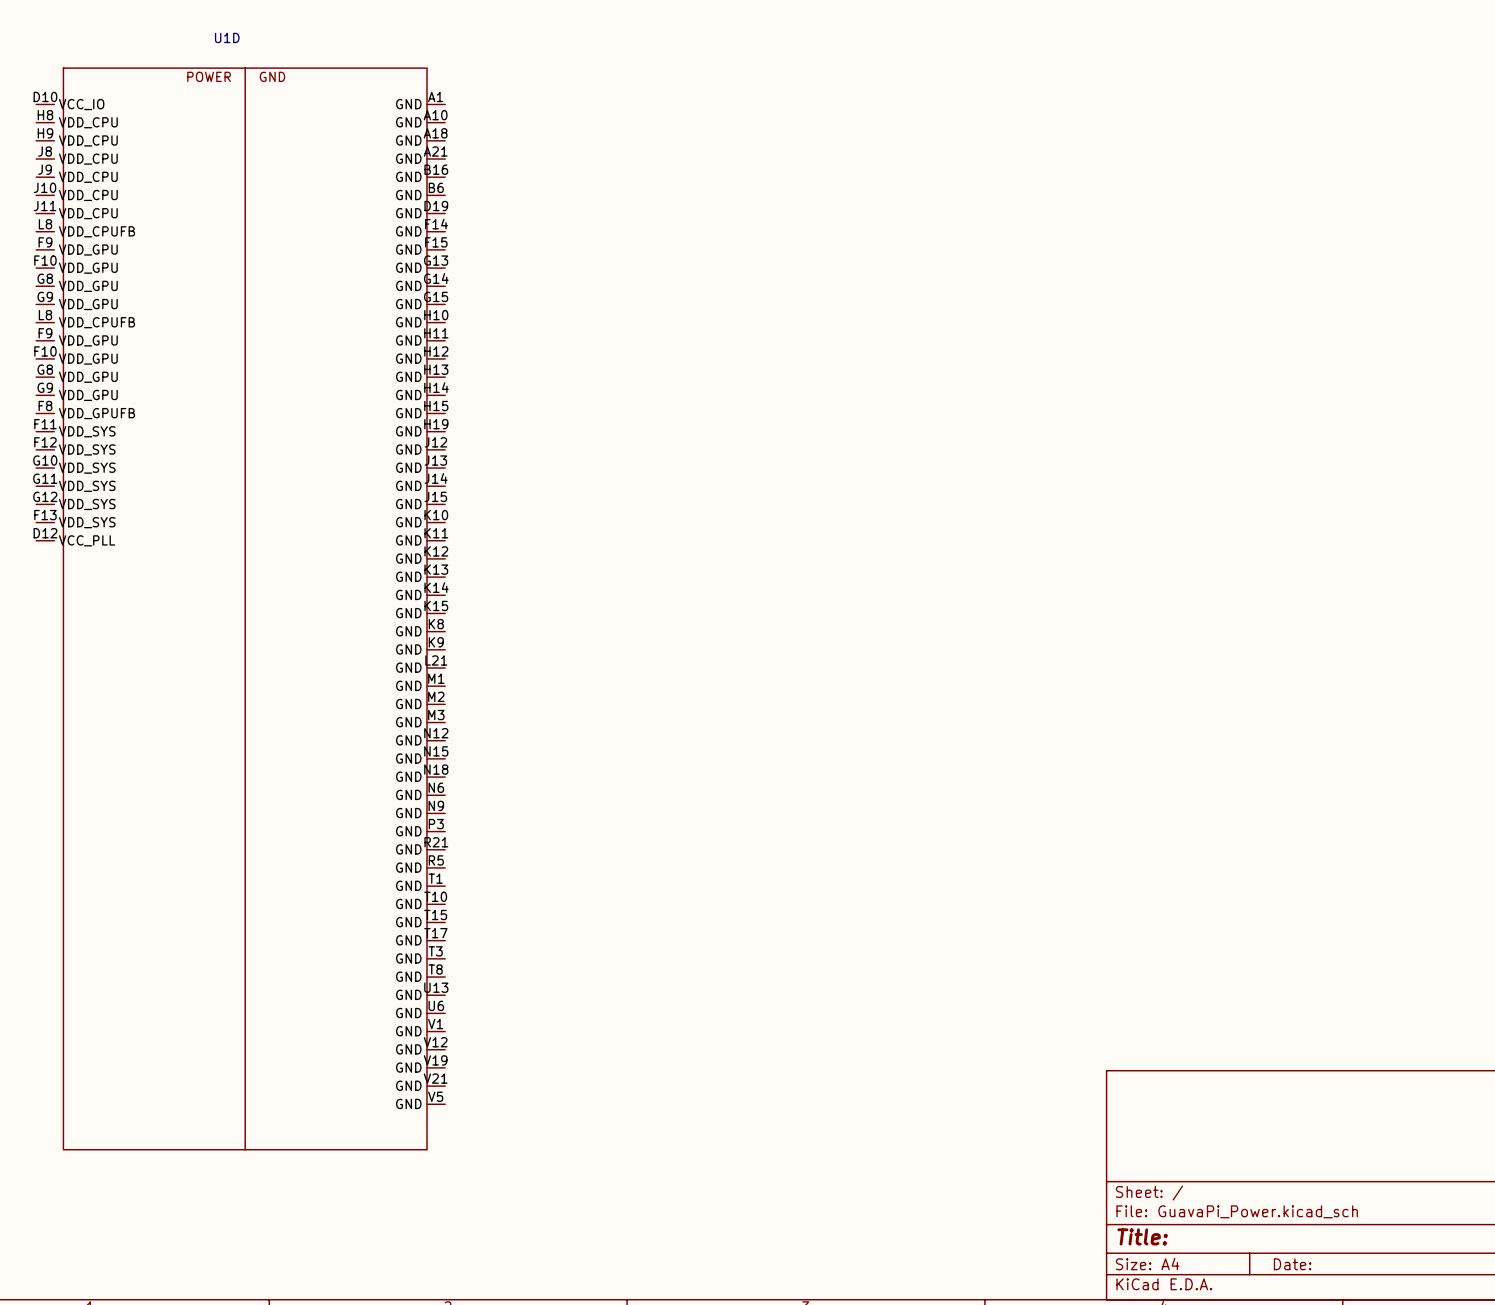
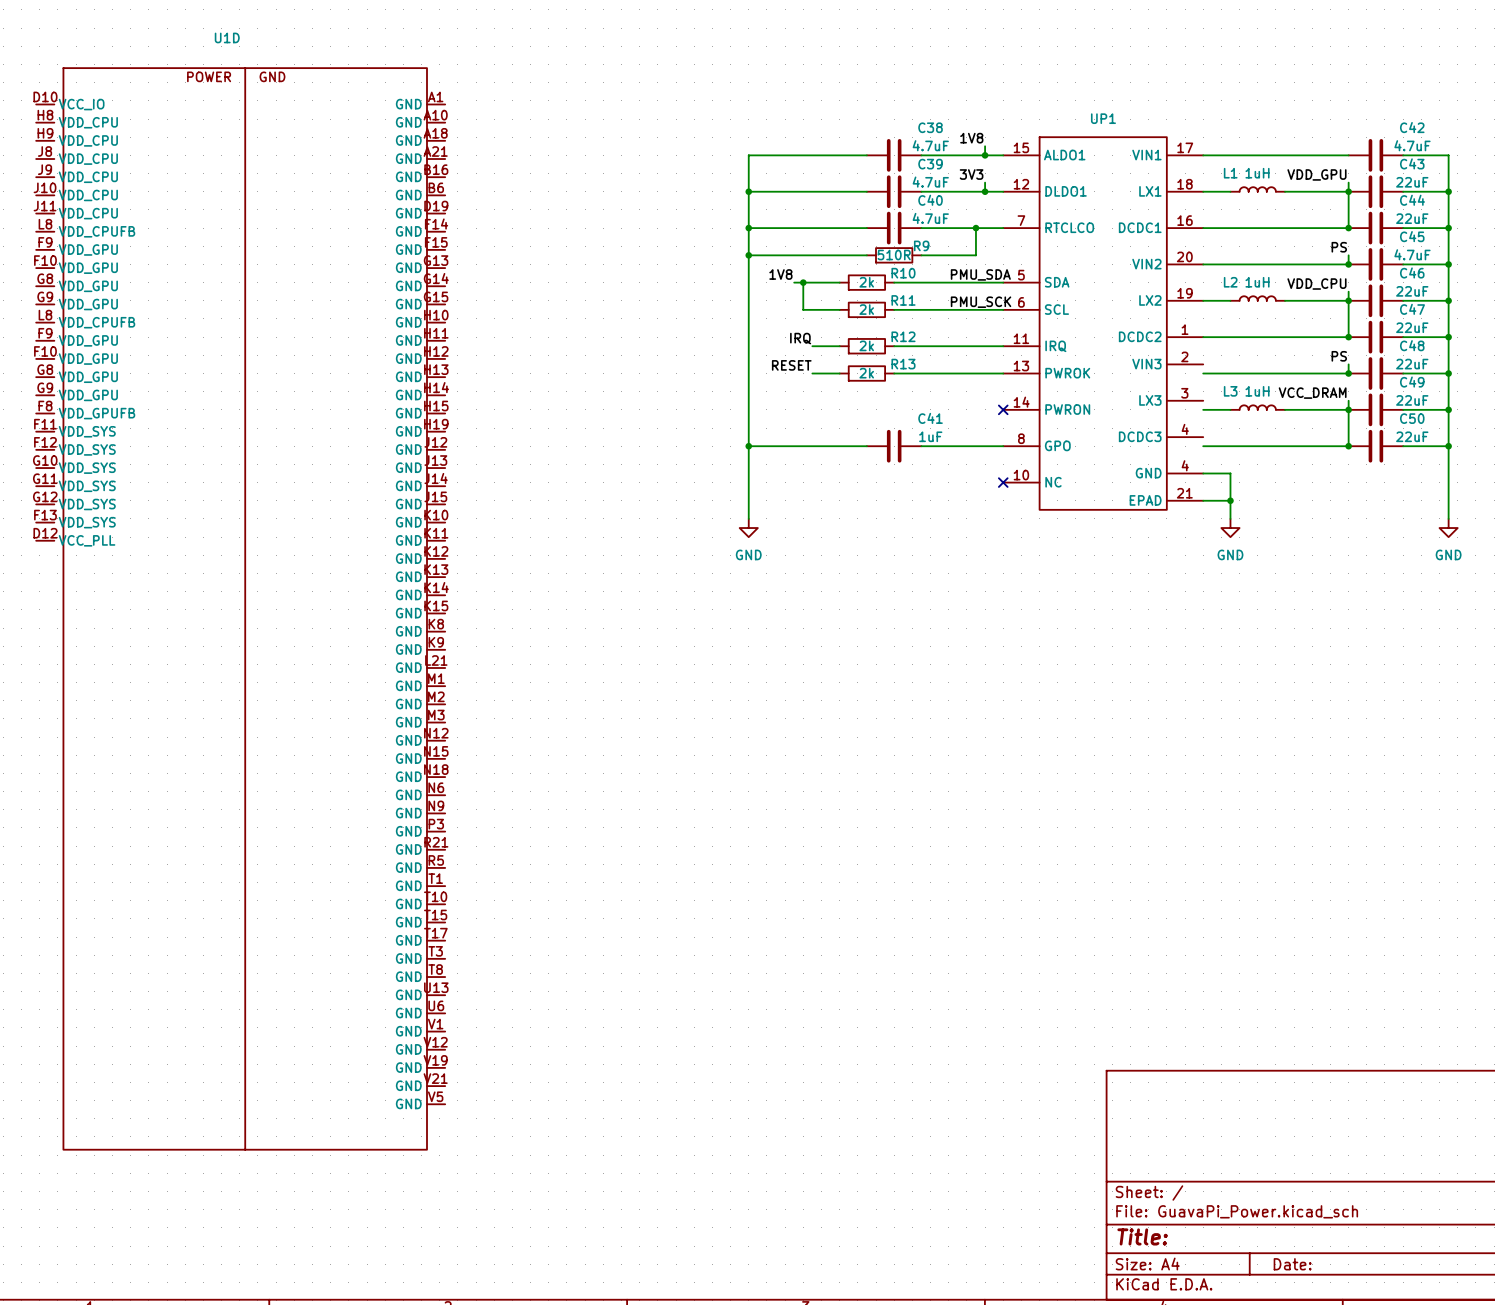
label: none -> 1V8 (971, 138)
wire: none -> (985, 146) (985, 155)
wire: none -> (866, 155) (748, 155) (748, 518)
C38: none -> 4.7uF (894, 155)
wire: none -> (921, 155) (1003, 155)
junction: none -> (985, 155)
wire: none -> (1203, 155) (1348, 155)
C42: none -> 4.7uF (1375, 155)
wire: none -> (1403, 155) (1448, 155) (1448, 518)
label: none -> 3V3 (971, 174)
label: none -> VDD_GPU (1316, 174)
wire: none -> (985, 182) (985, 191)
wire: none -> (1348, 182) (1348, 228) (1203, 228)
L1: none -> 1uH (1257, 189)
wire: none -> (748, 191) (866, 191)
junction: none -> (748, 191)
C39: none -> 4.7uF (894, 191)
wire: none -> (921, 191) (1003, 191)
junction: none -> (985, 191)
wire: none -> (1203, 191) (1230, 191)
wire: none -> (1285, 191) (1348, 191)
junction: none -> (1348, 191)
C43: none -> 22uF (1375, 191)
wire: none -> (1403, 191) (1448, 191)
junction: none -> (1448, 191)
wire: none -> (748, 228) (866, 228)
junction: none -> (748, 228)
C40: none -> 4.7uF (894, 228)
wire: none -> (921, 228) (1003, 228)
wire: none -> (975, 228) (975, 255) (921, 255)
junction: none -> (975, 228)
junction: none -> (1348, 228)
C44: none -> 22uF (1375, 228)
wire: none -> (1403, 228) (1448, 228)
junction: none -> (1448, 228)
label: none -> PS (1339, 247)
wire: none -> (748, 255) (866, 255)
junction: none -> (748, 255)
R9: none -> 510R (894, 255)
wire: none -> (1348, 255) (1348, 264) (1203, 264)
junction: none -> (1348, 264)
C45: none -> 4.7uF (1375, 264)
wire: none -> (1403, 264) (1448, 264)
junction: none -> (1448, 264)
label: none -> 1V8 (780, 274)
label: none -> PMU_SDA (980, 274)
wire: none -> (794, 282) (839, 282)
wire: none -> (803, 282) (803, 309) (839, 309)
junction: none -> (803, 282)
R10: none -> 2k (866, 282)
wire: none -> (894, 282) (1003, 282)
label: none -> VDD_CPU (1316, 284)
wire: none -> (1348, 291) (1348, 337) (1203, 337)
L2: none -> 1uH (1257, 298)
wire: none -> (1203, 300) (1230, 300)
wire: none -> (1285, 300) (1348, 300)
junction: none -> (1348, 300)
C46: none -> 22uF (1375, 300)
wire: none -> (1403, 300) (1448, 300)
junction: none -> (1448, 300)
label: none -> PMU_SCK (981, 302)
R11: none -> 2k (866, 309)
wire: none -> (894, 309) (1003, 309)
UP1: none -> (1103, 323)
junction: none -> (1348, 337)
C47: none -> 22uF (1375, 337)
wire: none -> (1403, 337) (1448, 337)
junction: none -> (1448, 337)
label: none -> IRQ (800, 338)
wire: none -> (812, 346) (839, 346)
R12: none -> 2k (866, 346)
wire: none -> (894, 346) (1003, 346)
label: none -> PS (1339, 356)
wire: none -> (1348, 364) (1348, 373) (1203, 373)
label: none -> RESET (791, 365)
wire: none -> (812, 373) (839, 373)
R13: none -> 2k (866, 373)
wire: none -> (894, 373) (1003, 373)
junction: none -> (1348, 373)
C48: none -> 22uF (1375, 373)
wire: none -> (1403, 373) (1448, 373)
junction: none -> (1448, 373)
label: none -> VCC_DRAM (1312, 393)
wire: none -> (1348, 400) (1348, 446) (1203, 446)
L3: none -> 1uH (1257, 407)
no-connect mark: none -> (1003, 409)
wire: none -> (1203, 409) (1230, 409)
wire: none -> (1285, 409) (1348, 409)
junction: none -> (1348, 409)
C49: none -> 22uF (1375, 409)
wire: none -> (1403, 409) (1448, 409)
junction: none -> (1448, 409)
wire: none -> (748, 446) (866, 446)
junction: none -> (748, 446)
C41: none -> 1uF (894, 446)
wire: none -> (921, 446) (1003, 446)
junction: none -> (1348, 446)
C50: none -> 22uF (1375, 446)
wire: none -> (1403, 446) (1448, 446)
junction: none -> (1448, 446)
wire: none -> (1203, 473) (1230, 473) (1230, 518)
no-connect mark: none -> (1003, 482)
wire: none -> (1203, 500) (1230, 500)
junction: none -> (1230, 500)
power symbol: none -> GND (748, 528)
power symbol: none -> GND (1230, 528)
power symbol: none -> GND (1448, 528)

